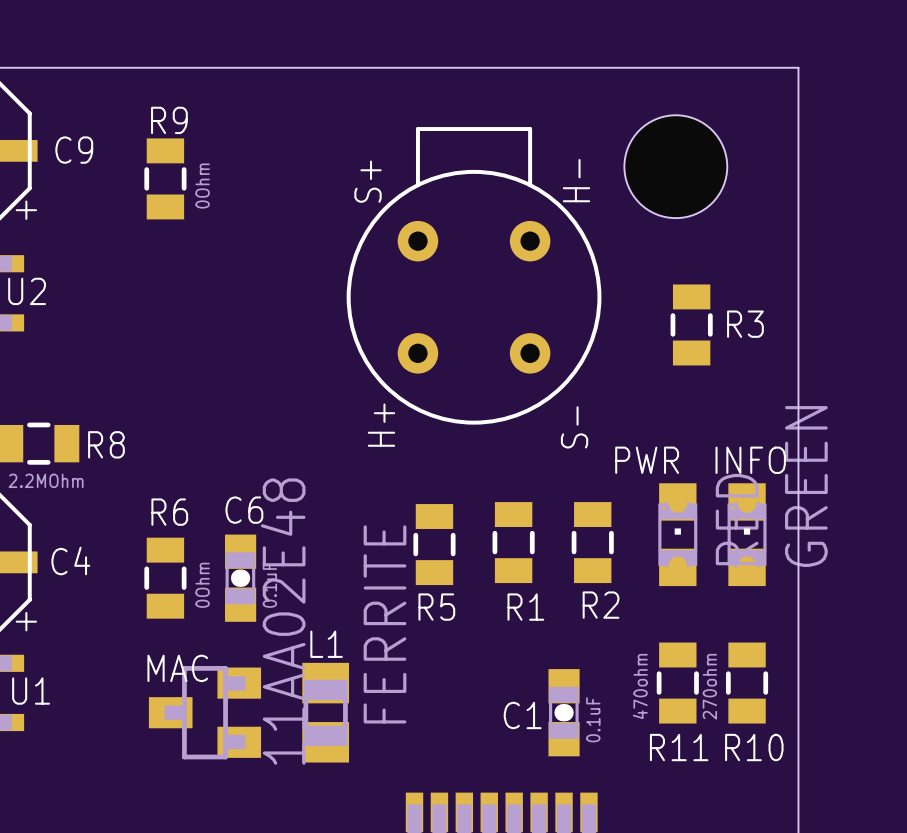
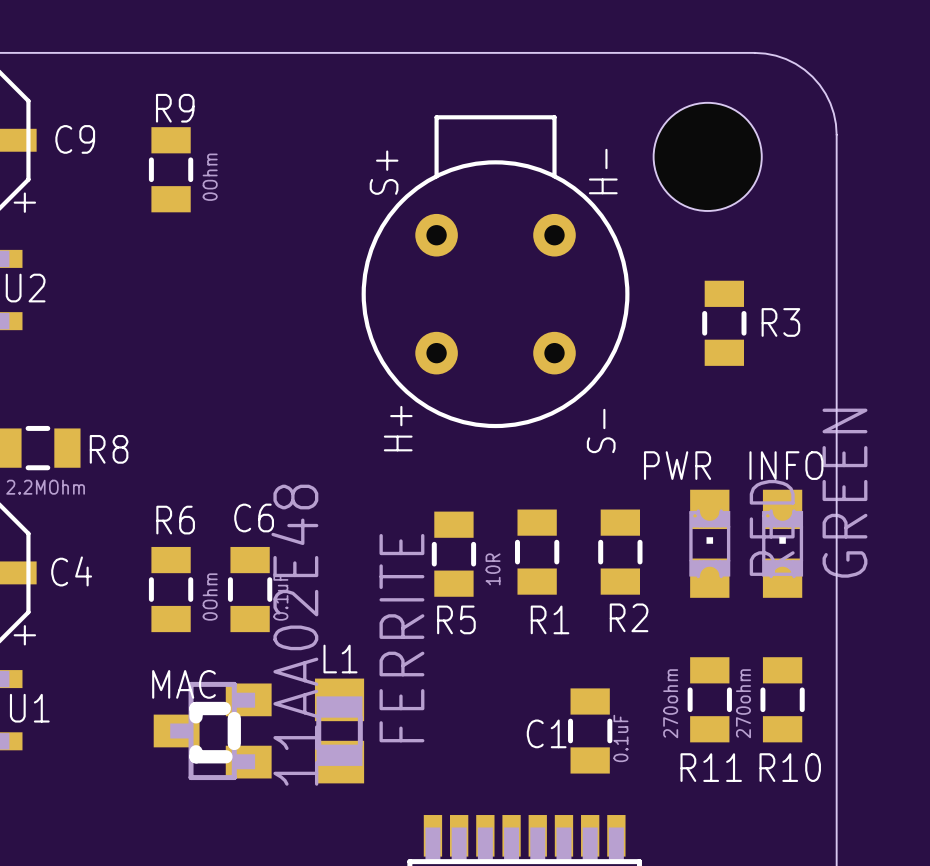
board edge: (720, 67) (798, 67) (798, 145) -> (754, 52) (786, 59) (812, 76) (830, 103) (836, 134)
C6 footprint: [225, 534, 257, 622] -> [227, 546, 273, 633]
R5 value: none -> 10R (493, 569)
C1 footprint: [548, 669, 580, 757] -> [568, 688, 613, 774]
R11 value: 470ohm (640, 686) -> 270ohm (670, 703)
line: none -> (224, 708) (196, 708) (196, 716)
line: none -> (234, 718) (234, 743)
line: none -> (196, 751) (196, 756) (225, 756)

